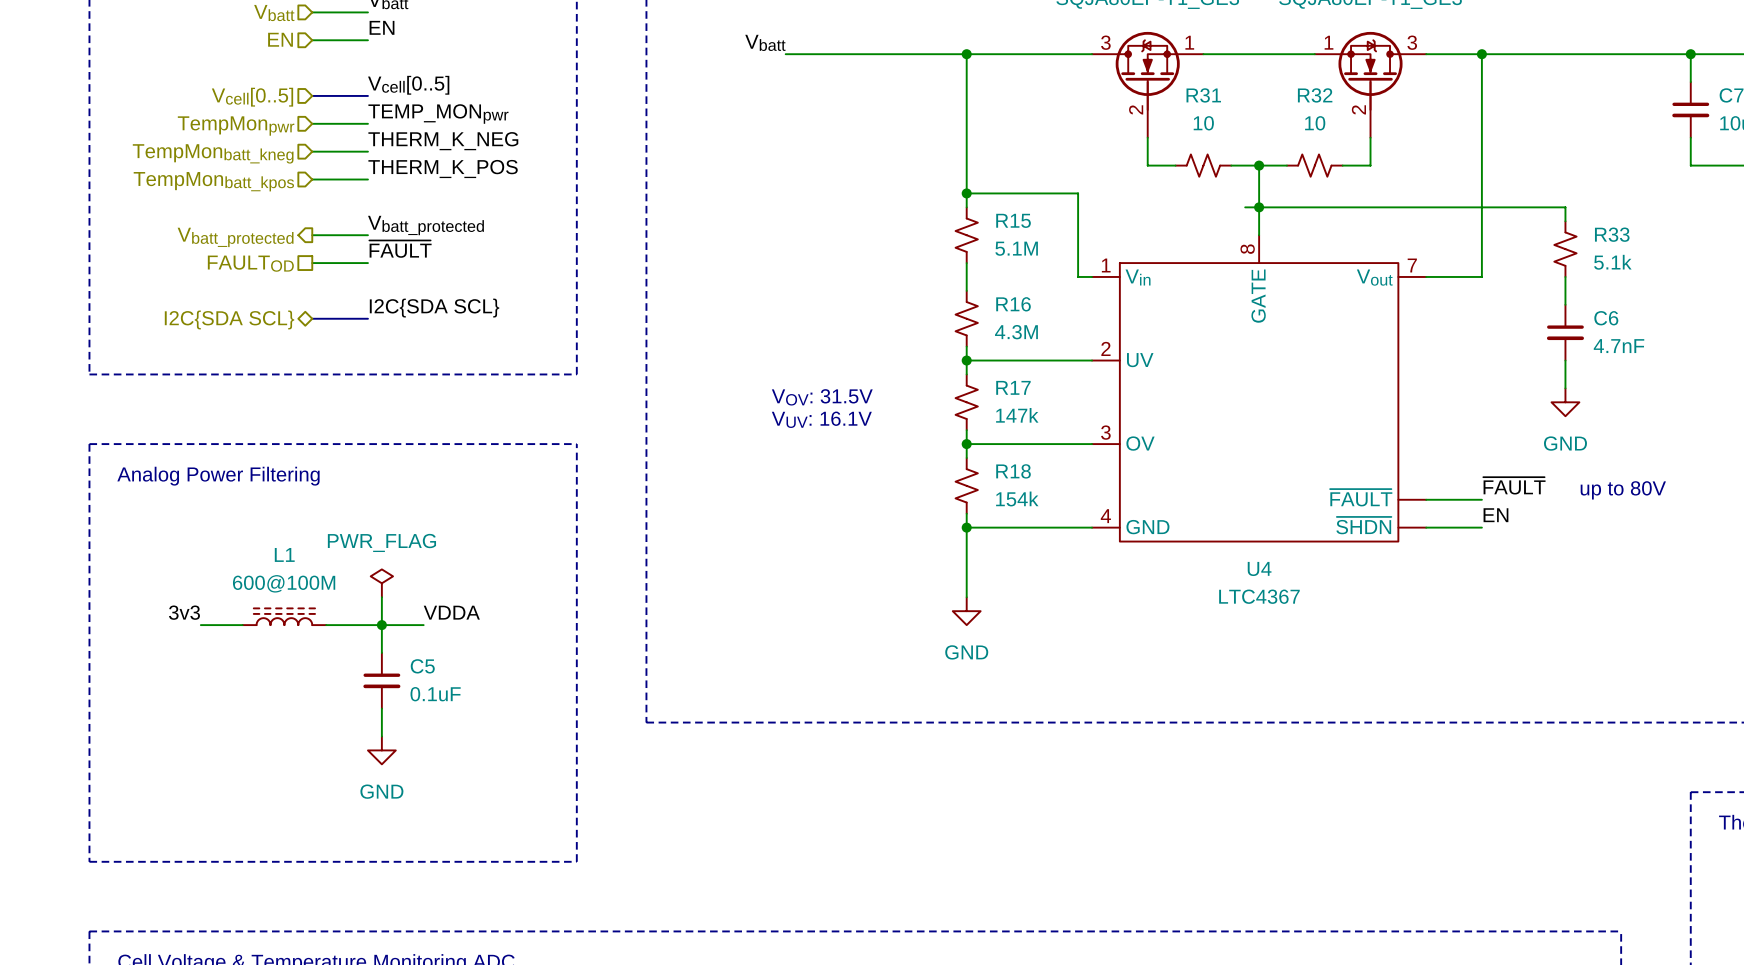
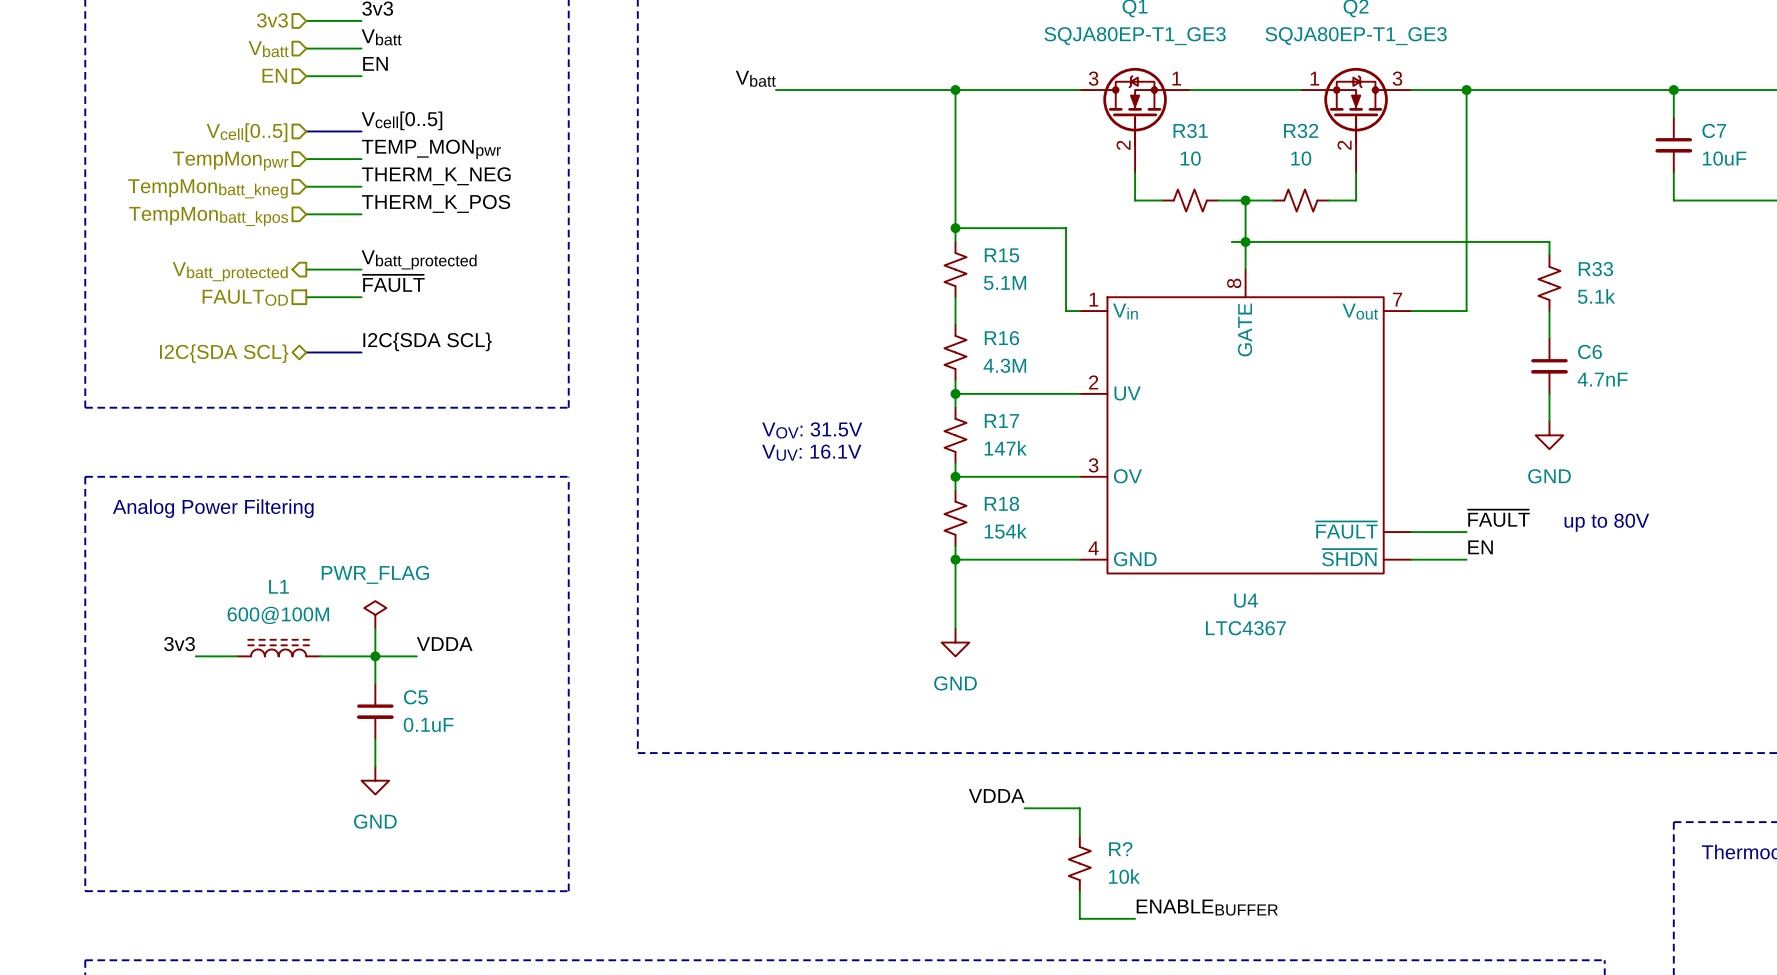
label: none -> VDDA (996, 795)
wire: none -> (1024, 808) (1079, 808) (1079, 835)
R?: none -> 10k (1079, 863)
wire: none -> (1079, 891) (1079, 918) (1135, 918)
label: none -> ENABLEBUFFER (1207, 907)

